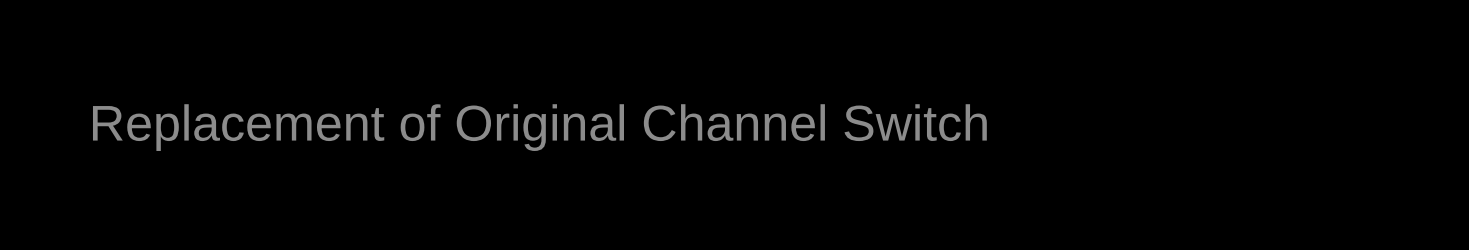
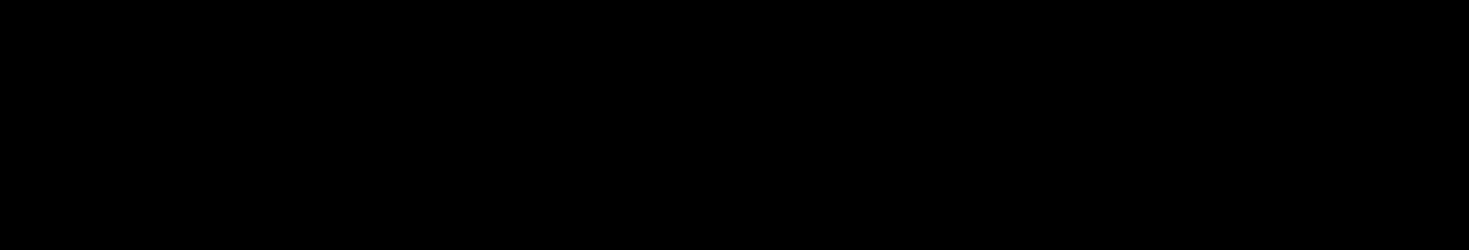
text: Replacement of Original Channel Switch (539, 127) -> none

